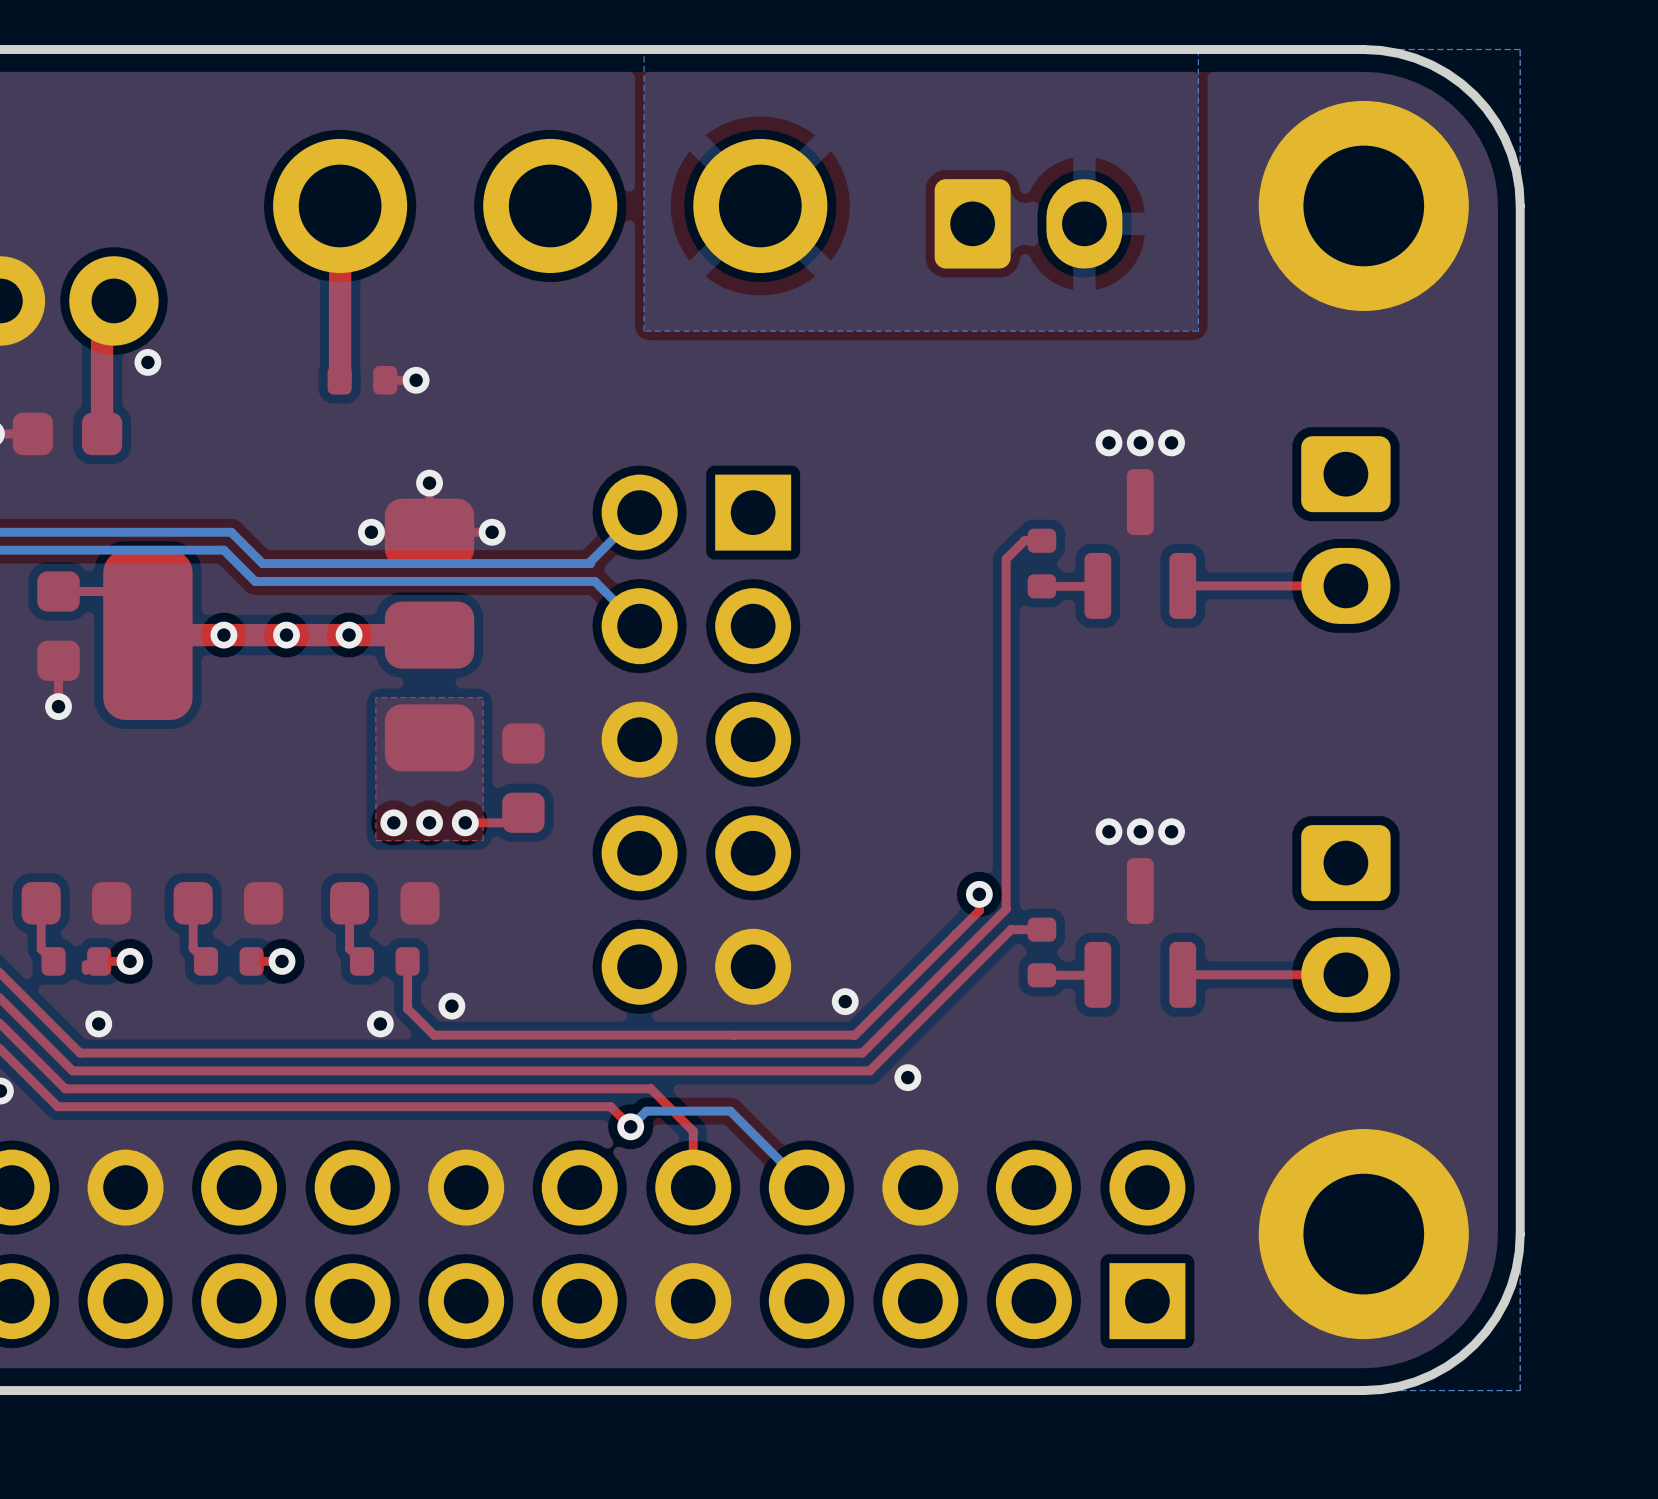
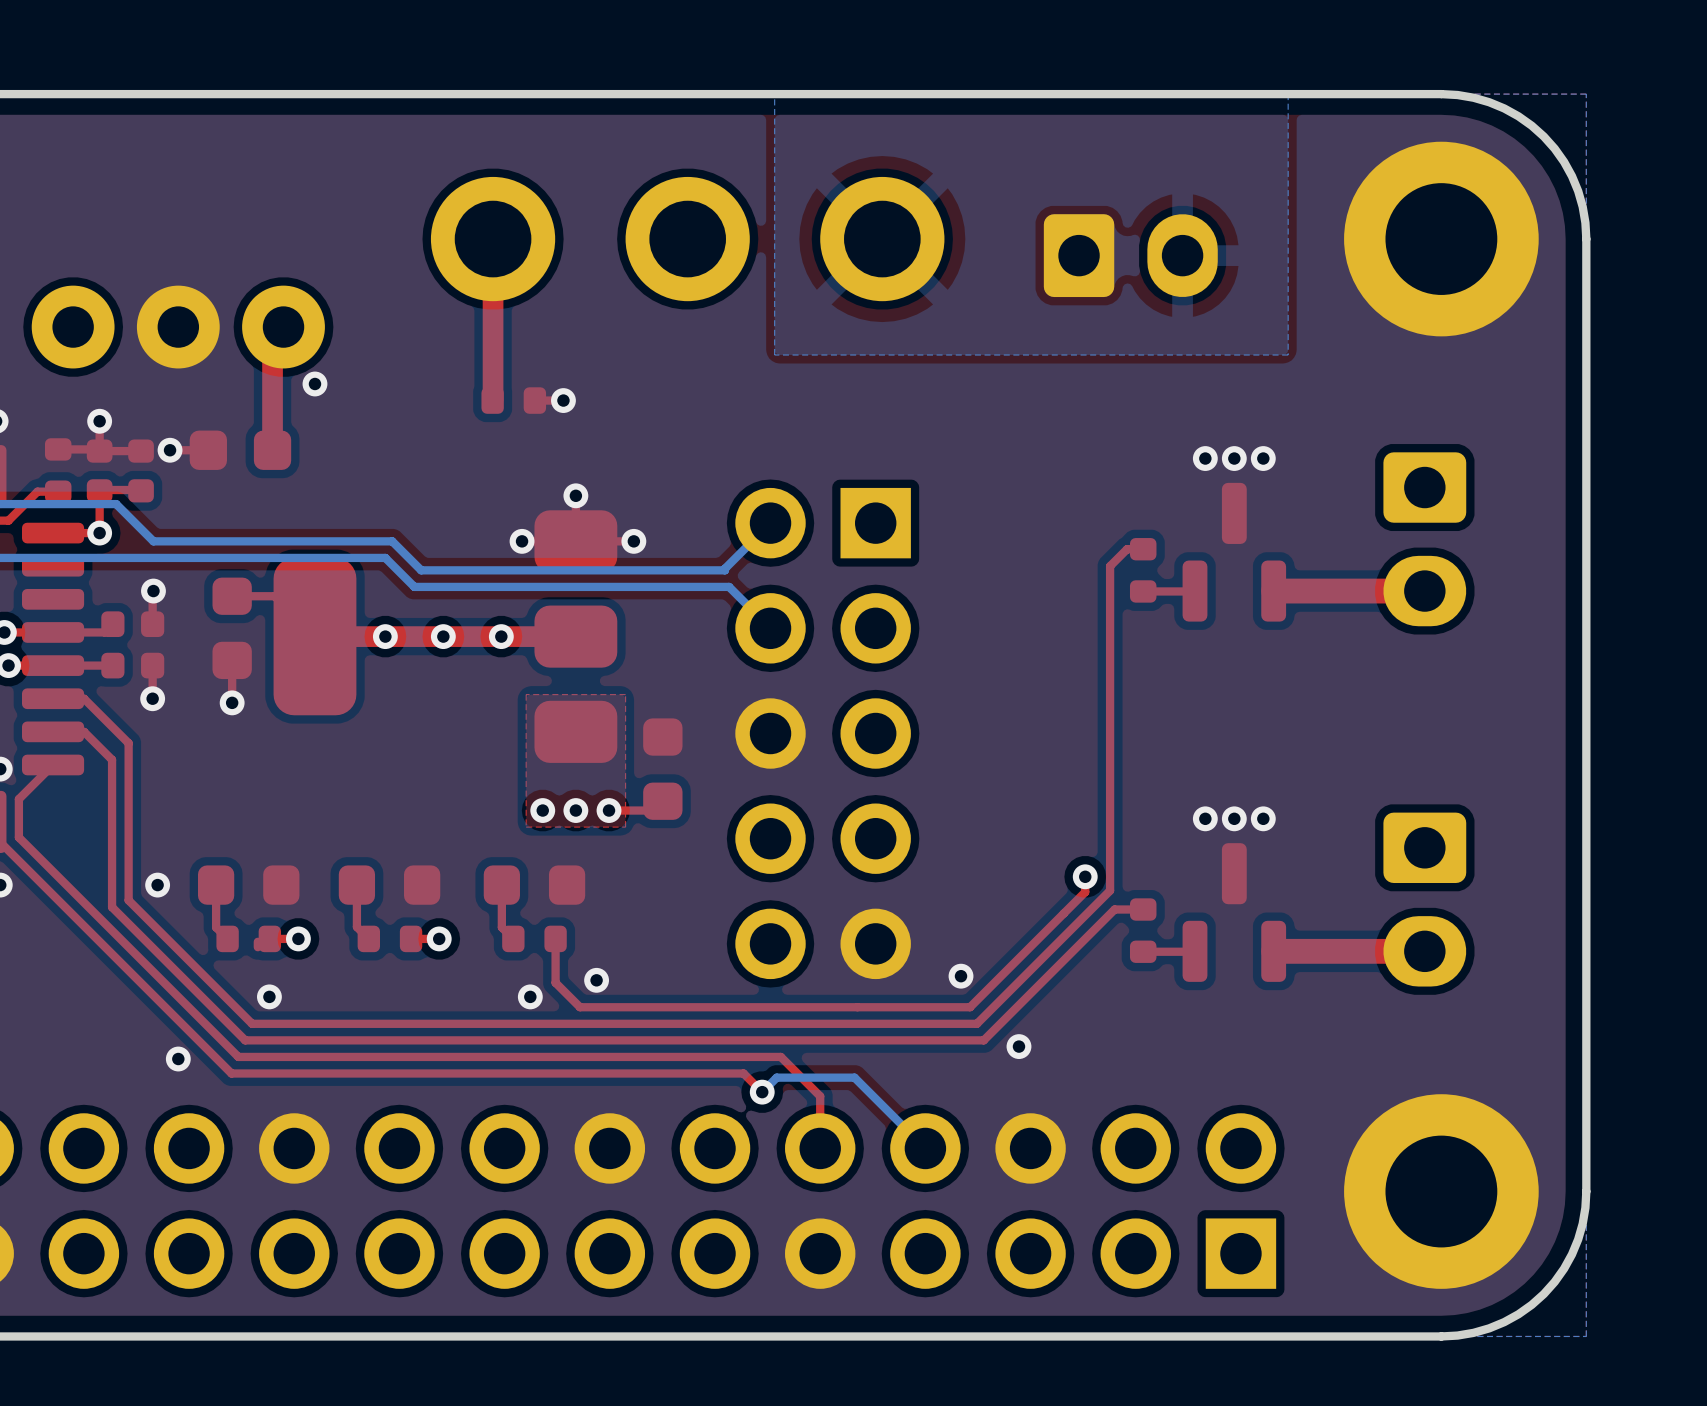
top track width: thin (1345, 585) (1182, 585) -> thick (1424, 591) (1273, 591)
top track width: thin (1345, 974) (1182, 974) -> thick (1424, 951) (1273, 951)

